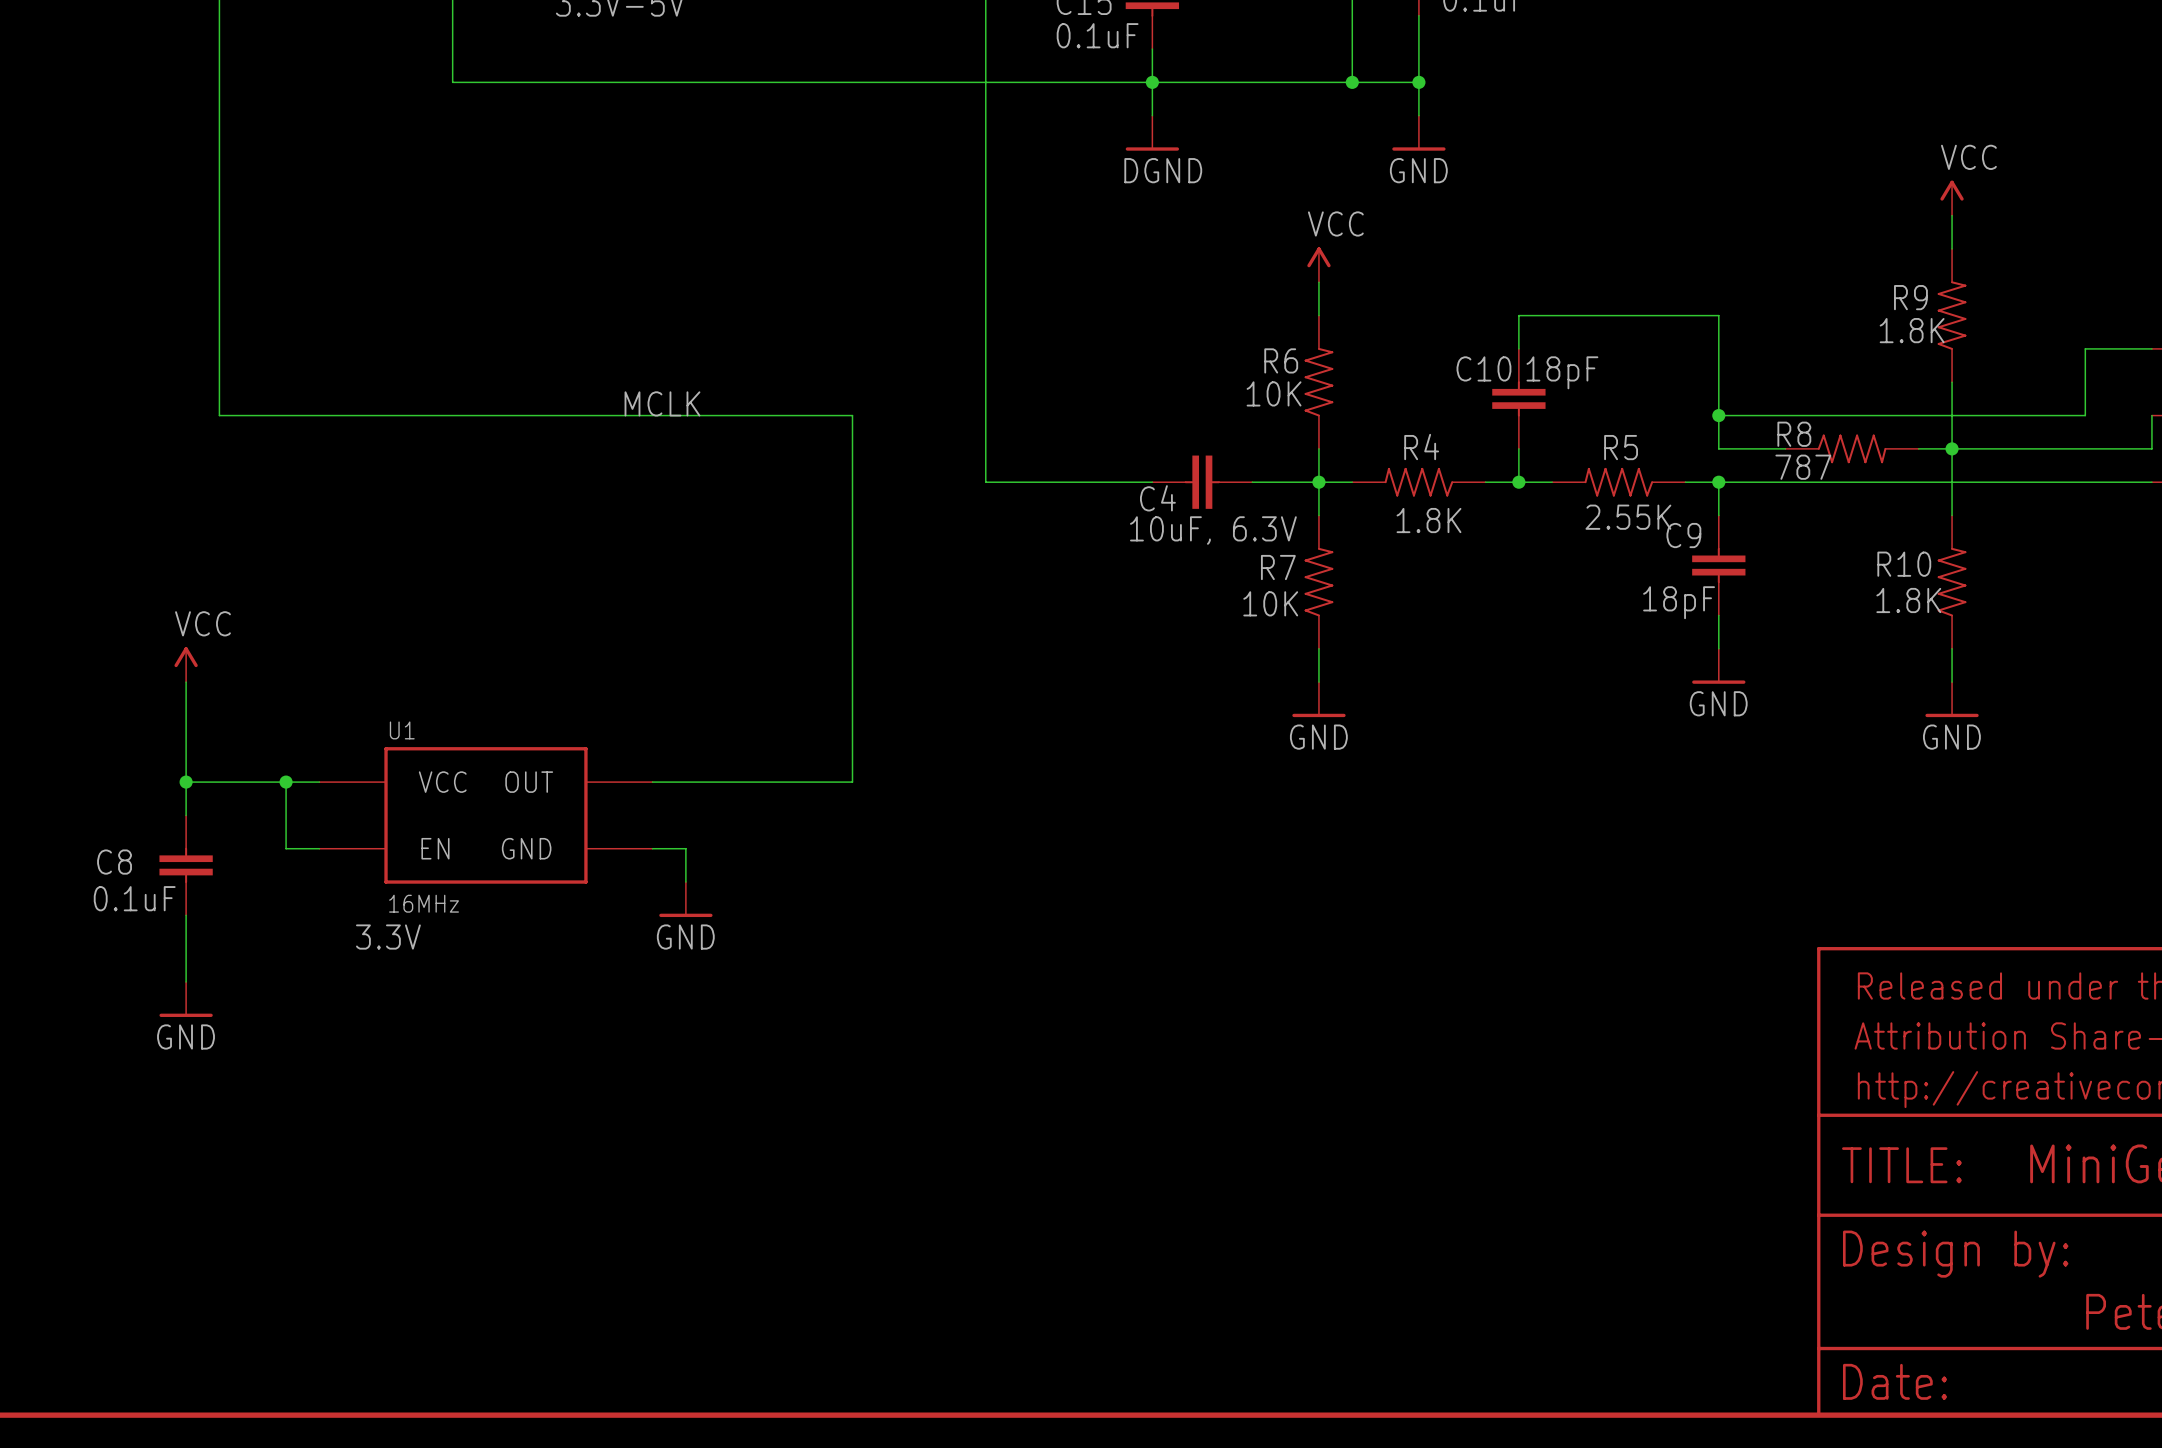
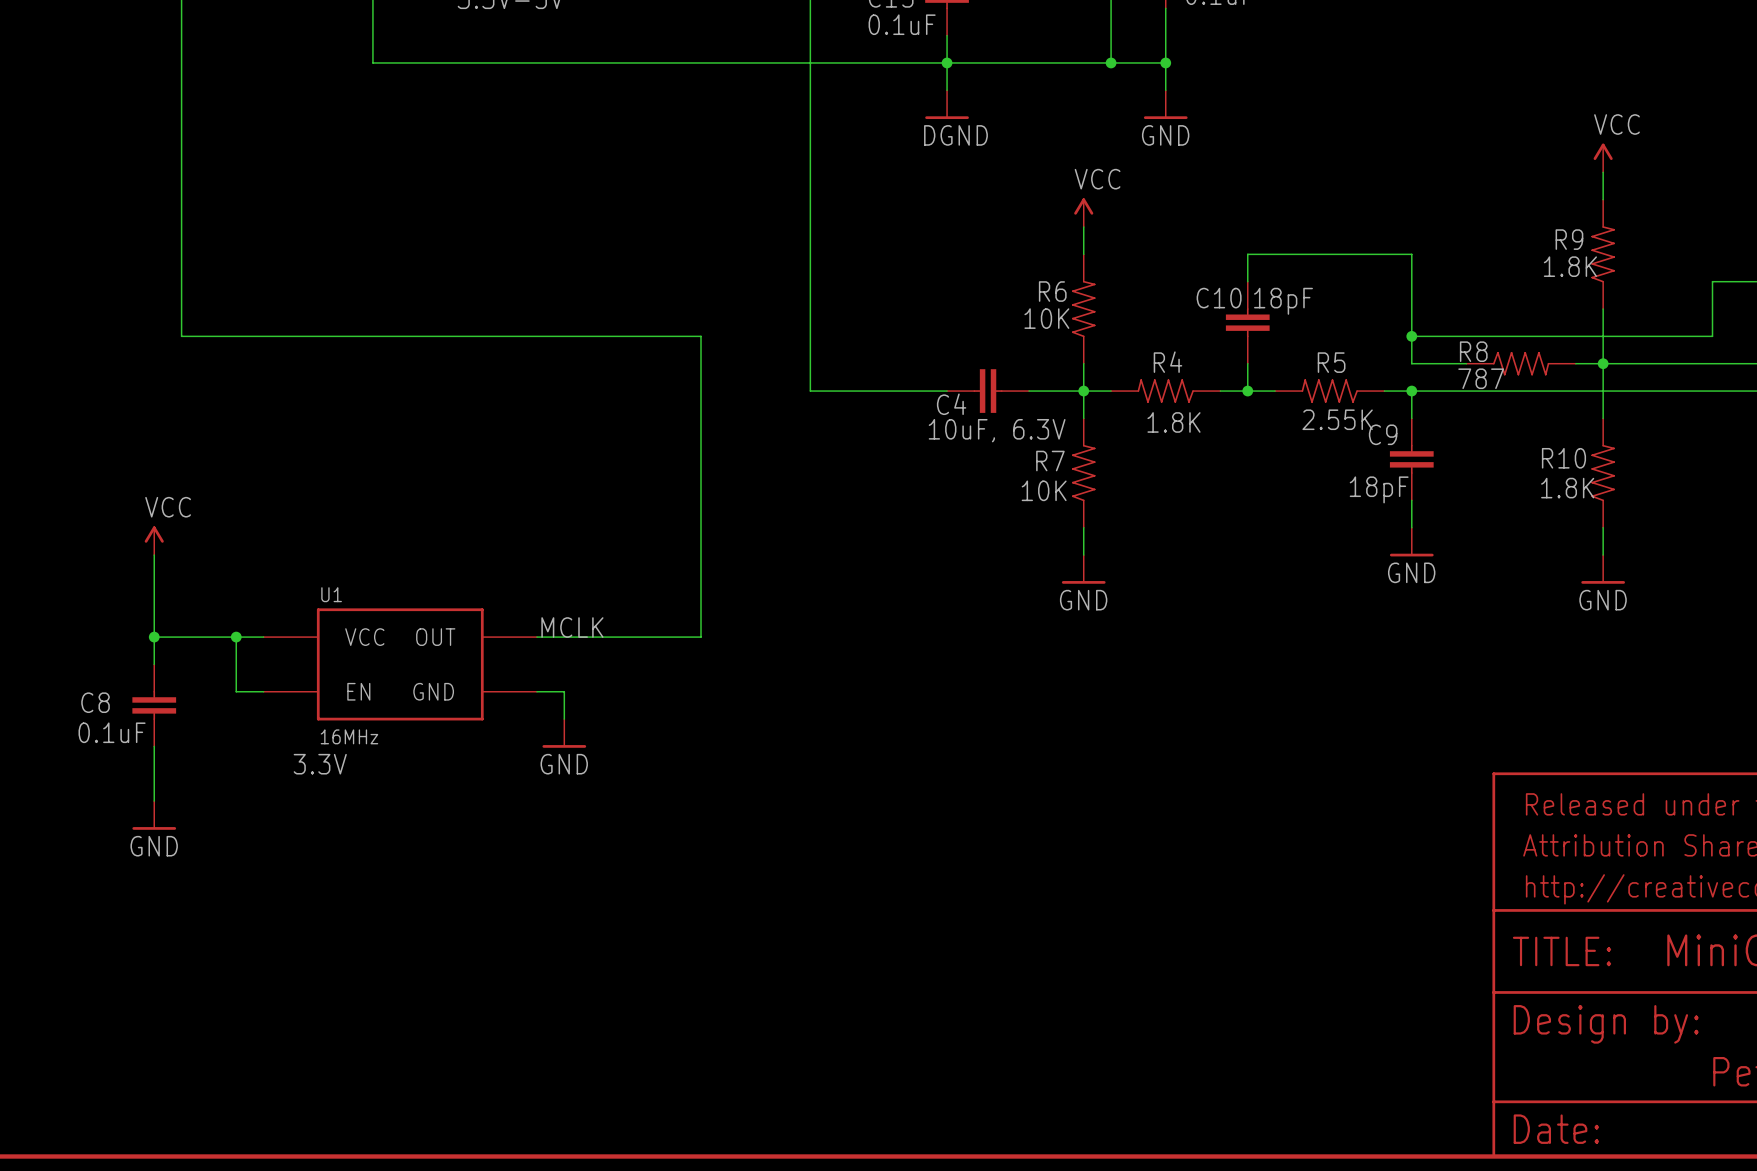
label: MCLK (662, 403) -> none
label: none -> MCLK (572, 627)

